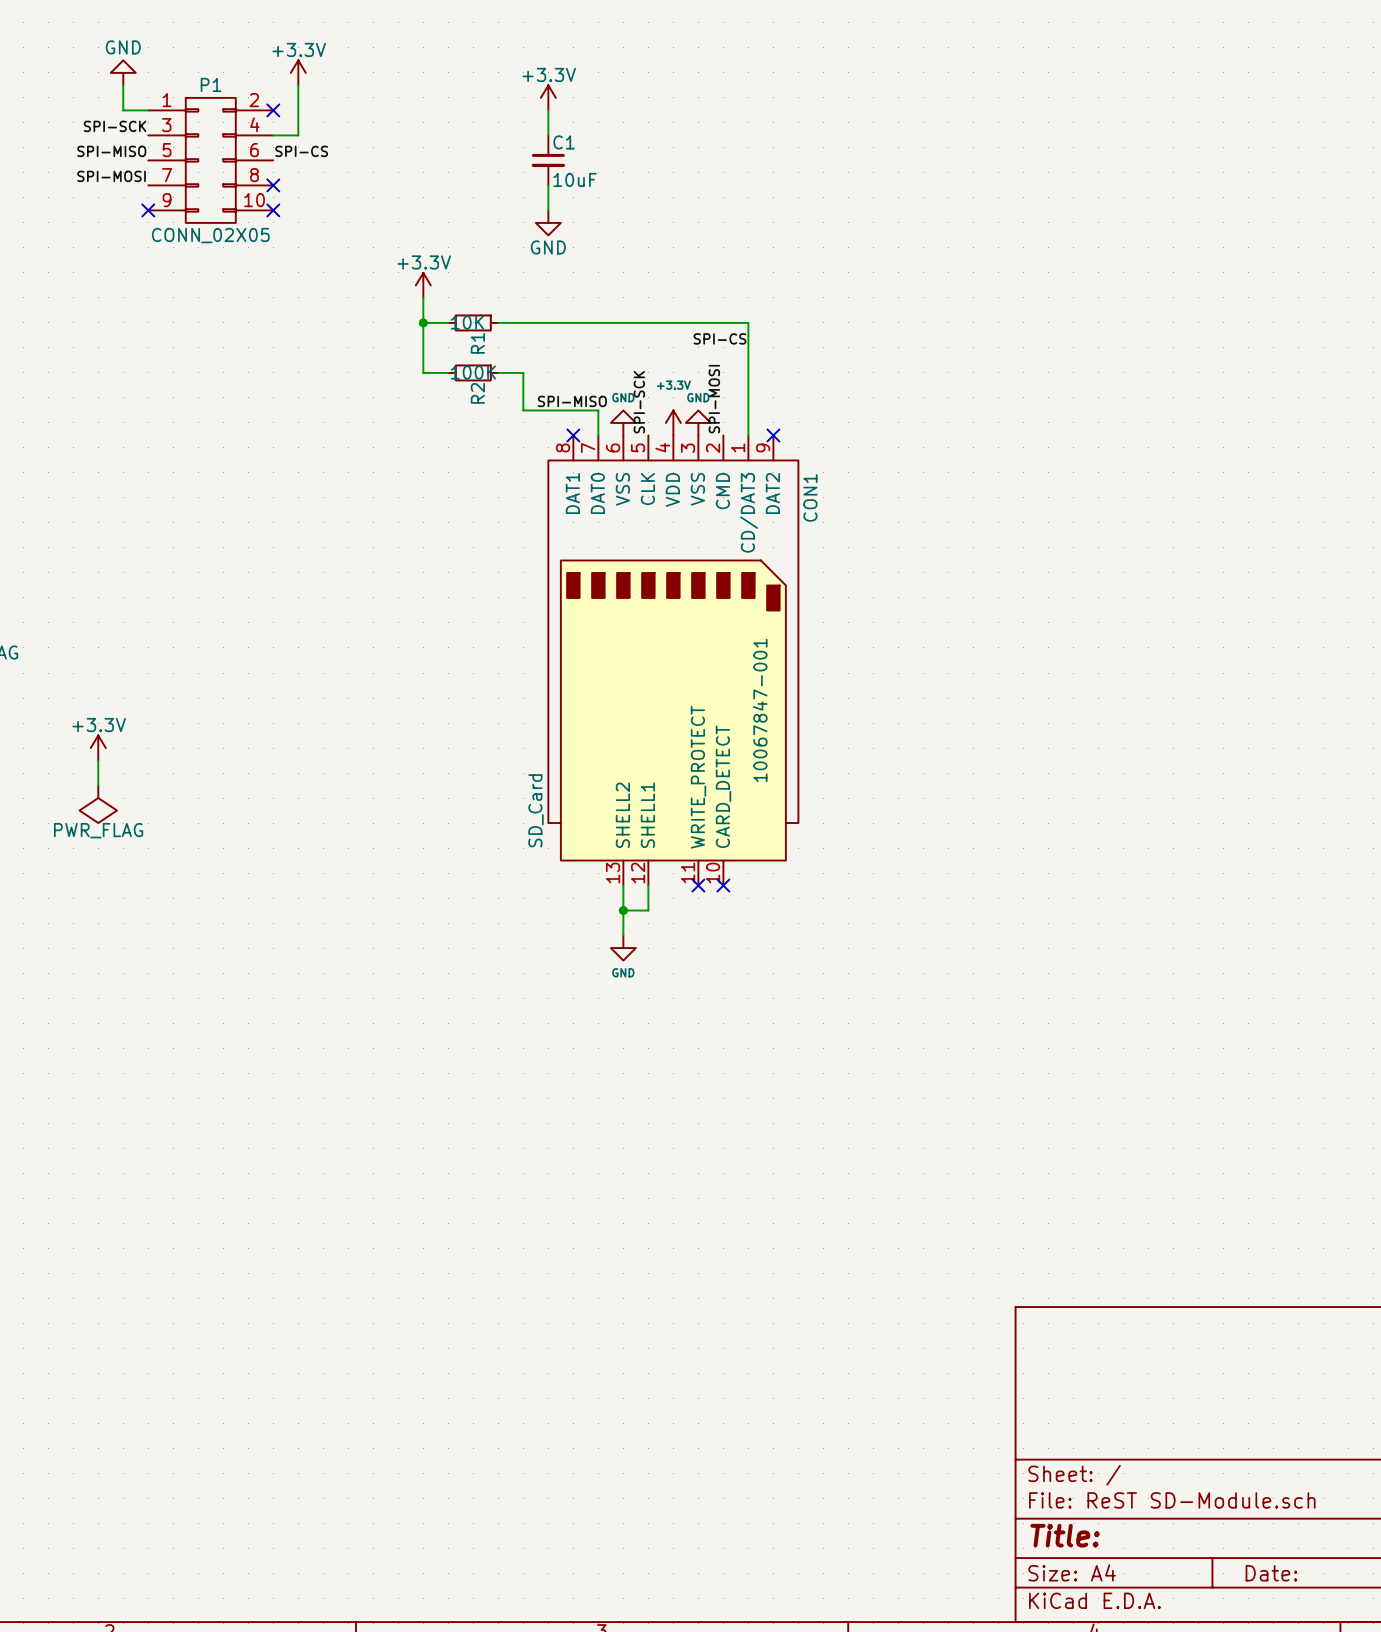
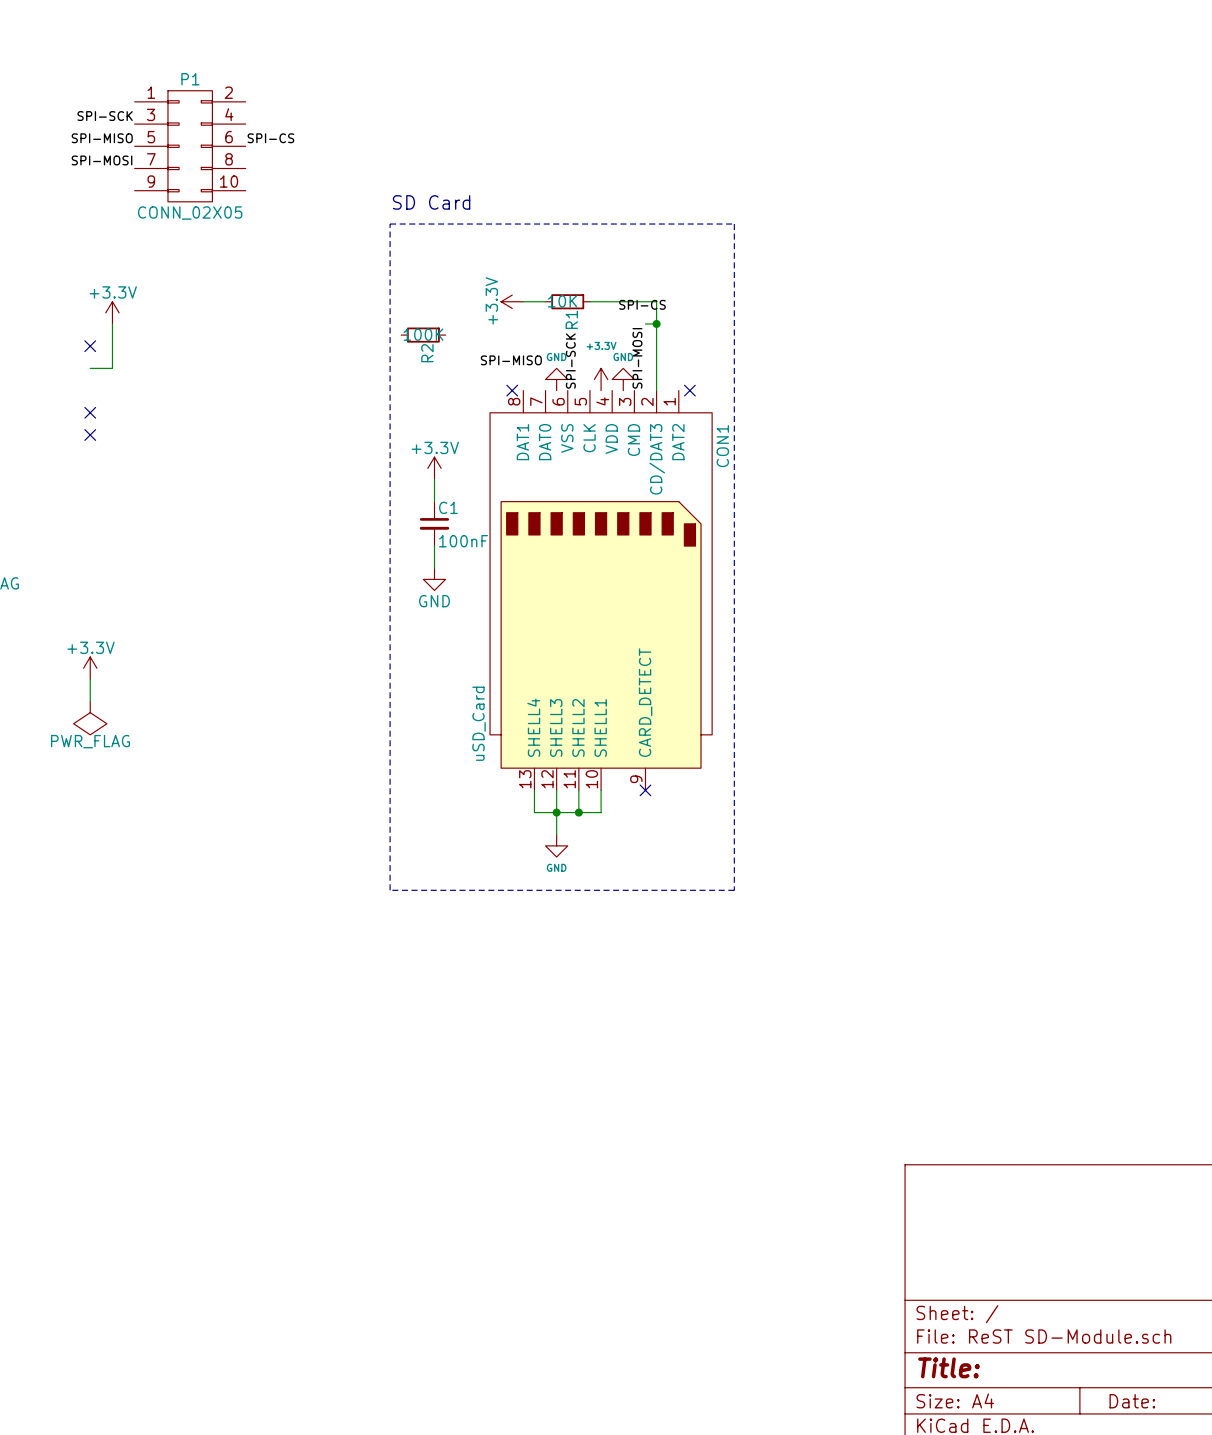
power symbol: GND (123, 72) -> none
power symbol: +3.3V (298, 72) -> none
wire: (123, 85) (123, 110) (148, 110) -> none
wire: (298, 85) (298, 135) (273, 135) -> none
power symbol: +3.3V (548, 97) -> none
no-connect mark: (273, 110) -> none
wire: (548, 110) (548, 135) -> none
C1 position: (548, 160) -> (434, 523)
C1 value: 10uF (575, 179) -> 100nF (463, 541)
no-connect mark: (273, 185) -> none
wire: (548, 185) (548, 210) -> none
no-connect mark: (148, 210) -> none
no-connect mark: (273, 210) -> none
power symbol: GND (548, 222) -> none
text: none -> SD Card (431, 202)
line: none -> (390, 224) (390, 890) (734, 890) (734, 224) (390, 224)
power symbol: +3.3V (423, 285) -> none
wire: (423, 297) (423, 372) (448, 372) -> none
wire: (423, 322) (448, 322) -> (523, 301) (545, 301)
junction: (423, 322) -> none
R1 position: (473, 322) -> (567, 301)
wire: (498, 322) (748, 322) (748, 435) -> none
power symbol: none -> +3.3V (512, 301)
wire: none -> (589, 301) (656, 301) (656, 390)
power symbol: none -> +3.3V (112, 312)
wire: none -> (112, 323) (112, 368) (90, 368)
wire: none -> (645, 323) (656, 323)
junction: none -> (656, 323)
wire: (498, 372) (523, 372) (523, 410) (598, 410) (598, 435) -> none
no-connect mark: none -> (90, 346)
CON1 symbol: [548, 435, 799, 886] -> [490, 390, 713, 791]
no-connect mark: none -> (90, 412)
no-connect mark: none -> (90, 435)
power symbol: none -> +3.3V (434, 468)
wire: none -> (434, 479) (434, 501)
wire: none -> (434, 546) (434, 568)
power symbol: none -> GND (434, 579)
CON1 text: 10067847-001 (760, 710) -> none
CON1 value: SD_Card (535, 810) -> uSD_Card (479, 723)
wire: none -> (534, 790) (534, 812) (556, 812)
wire: none -> (601, 790) (601, 812) (578, 812)
no-connect mark: (698, 885) -> none
junction: none -> (578, 812)

